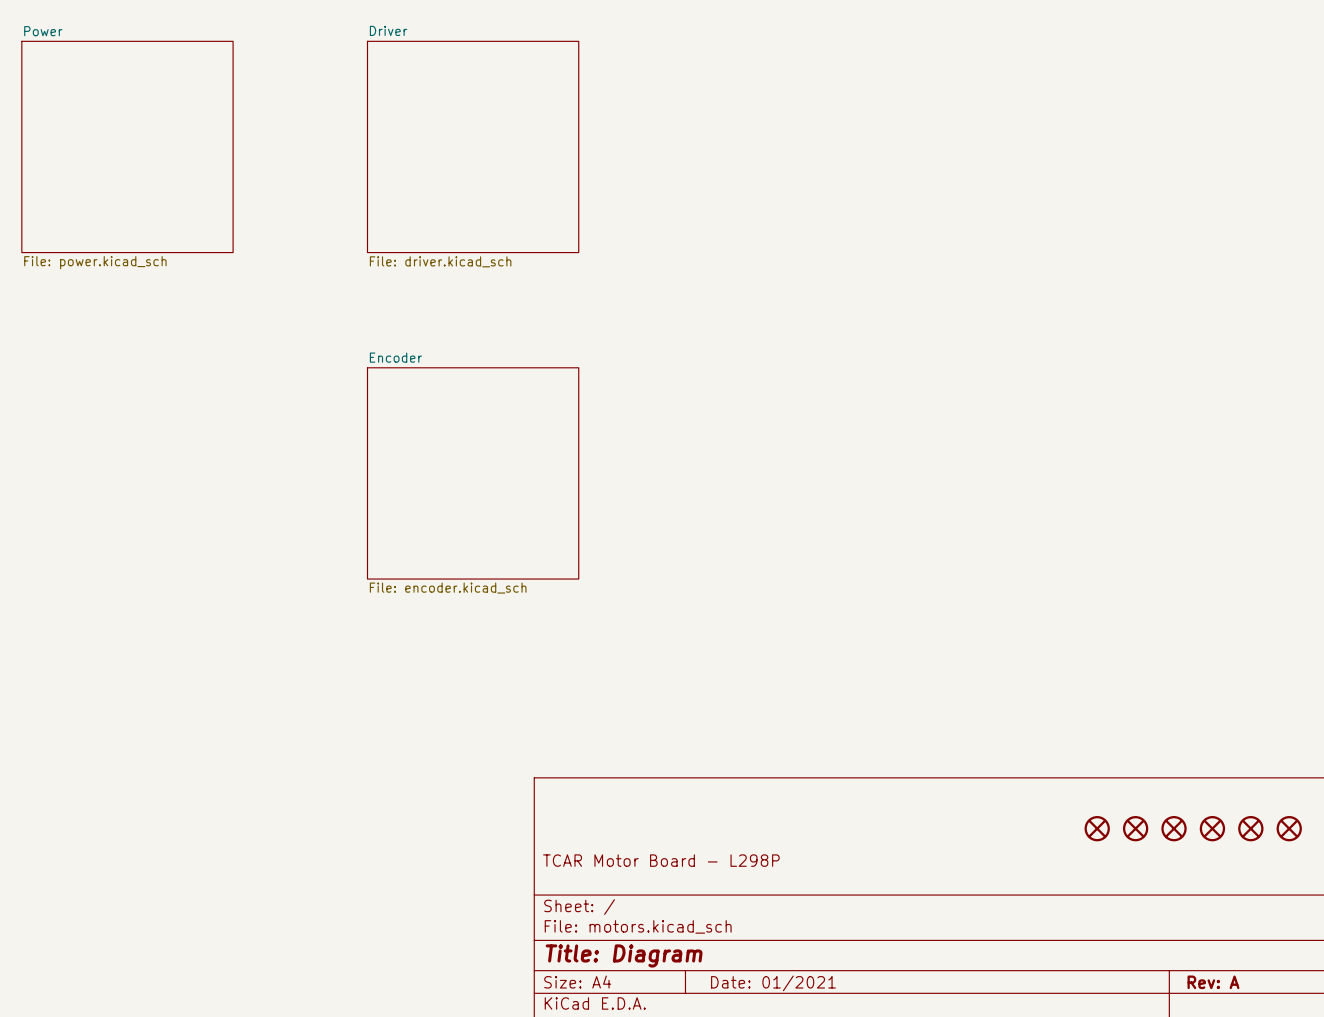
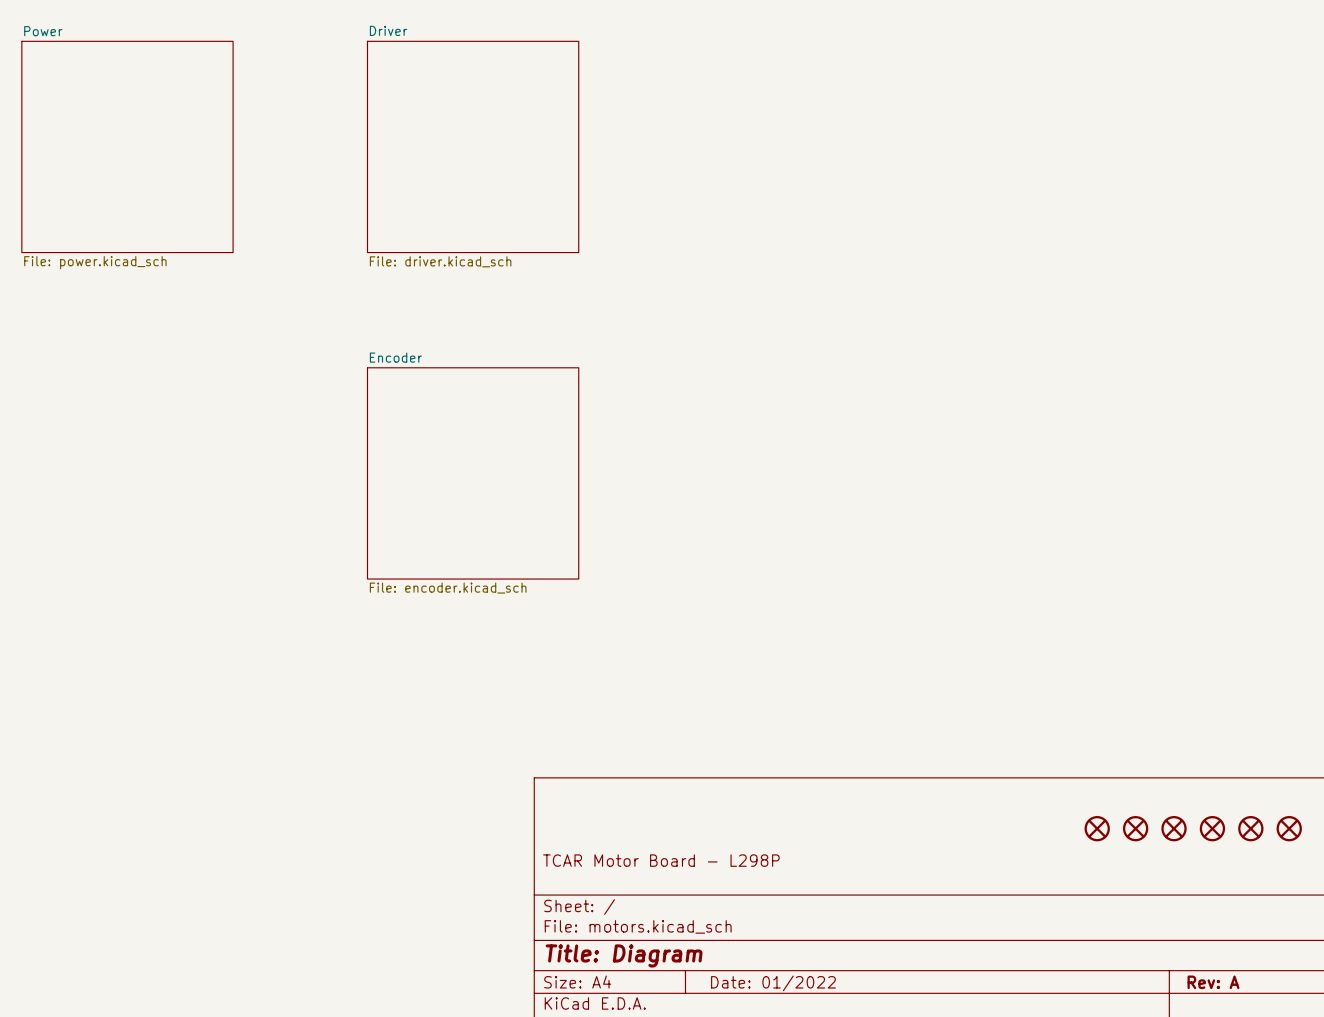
title block: Date: 01/2021 (773, 983) -> Date: 01/2022 (773, 983)

